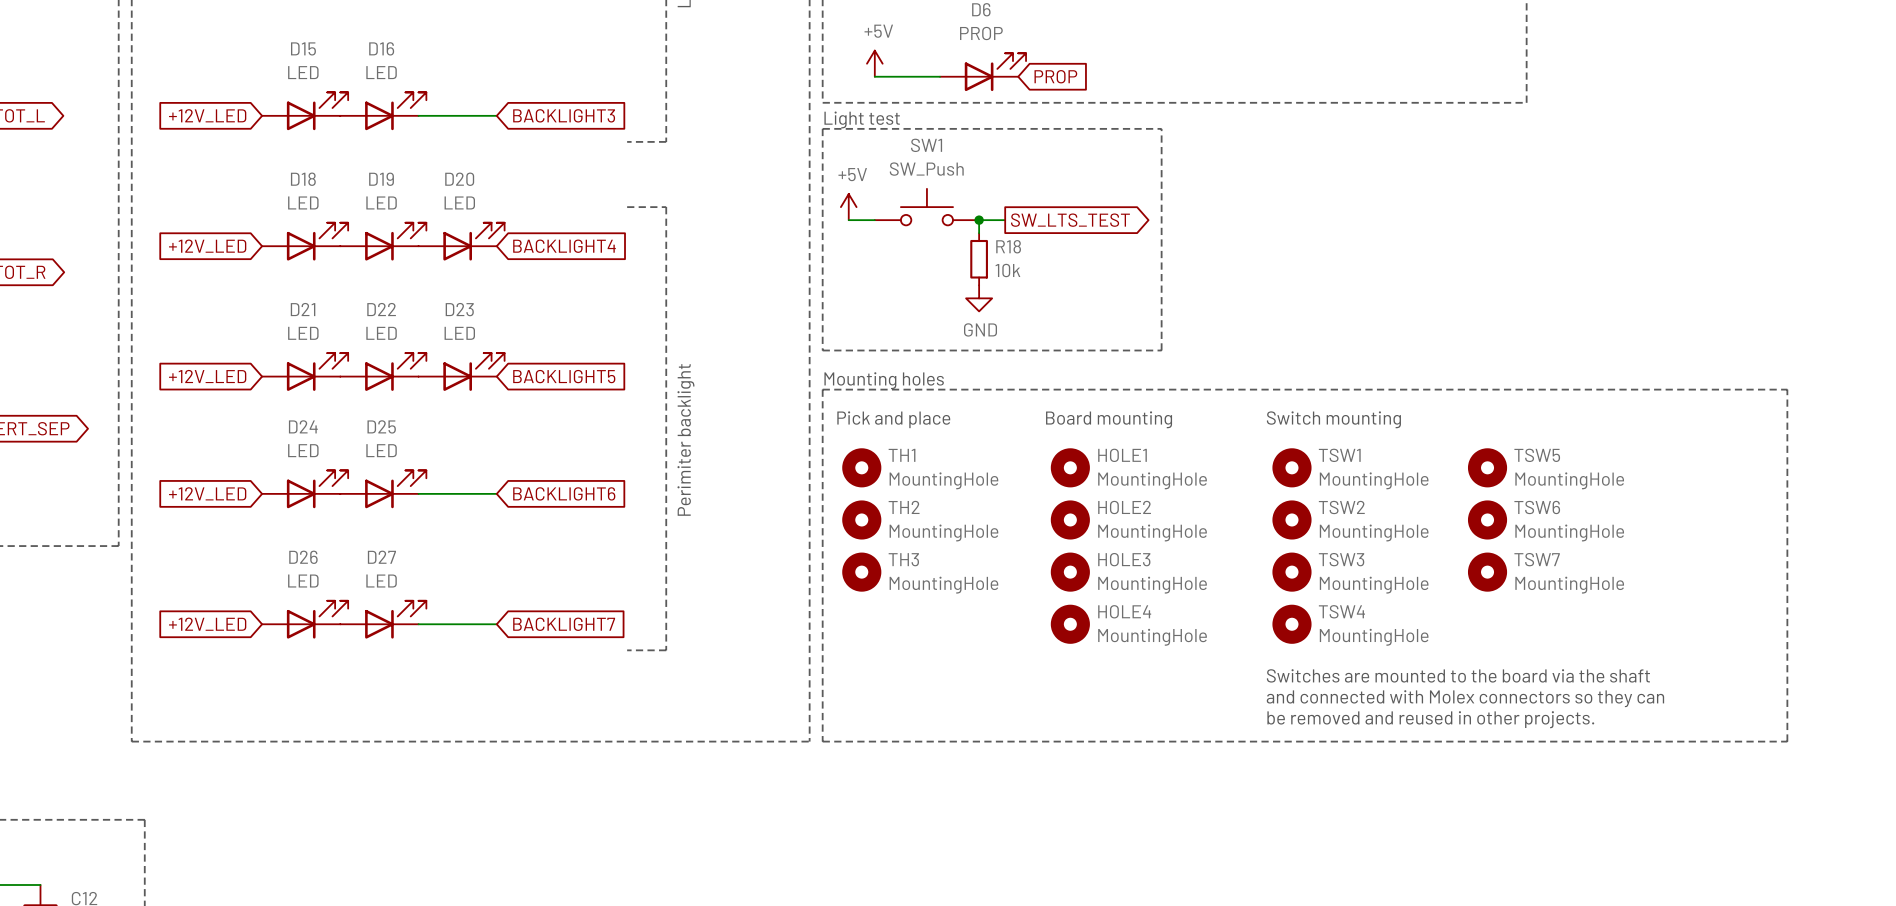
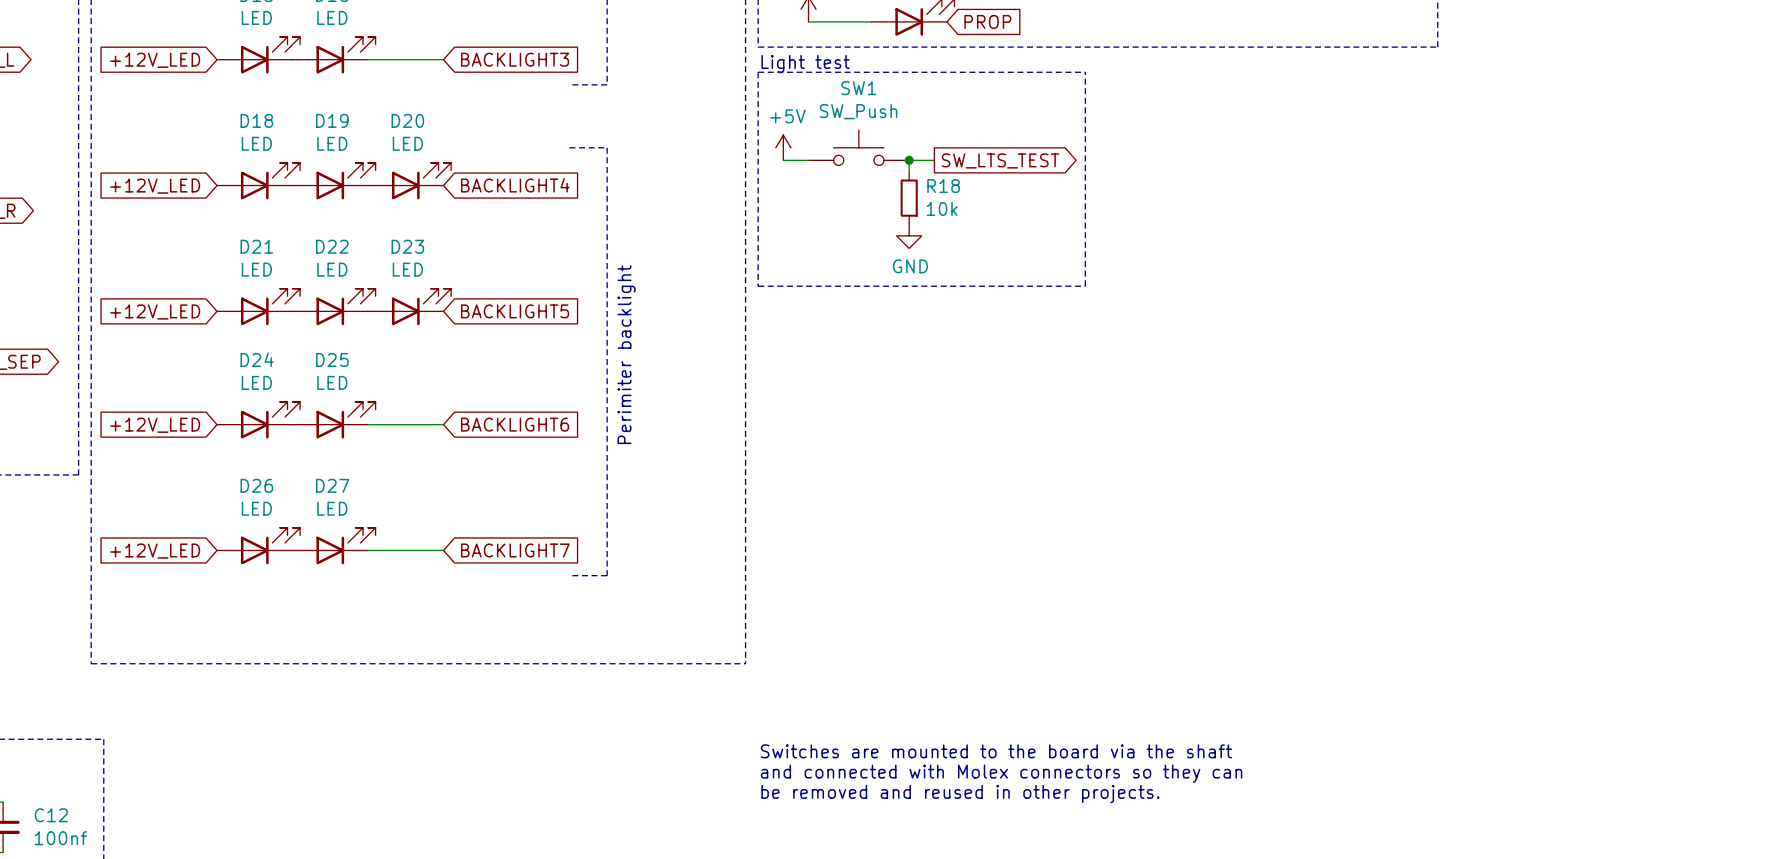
text: Mounting holes (884, 380) -> none
line: (822, 389) (822, 741) (1787, 741) (1787, 389) (822, 389) -> none
text: Pick and place (893, 419) -> none
text: Board mounting (1109, 419) -> none
text: Switch mounting (1333, 419) -> none
TH1: MountingHole (861, 467) -> none
HOLE1: MountingHole (1070, 467) -> none
TSW1: MountingHole (1291, 467) -> none
TSW5: MountingHole (1487, 467) -> none
TH2: MountingHole (861, 519) -> none
HOLE2: MountingHole (1070, 519) -> none
TSW2: MountingHole (1291, 519) -> none
TSW6: MountingHole (1487, 519) -> none
TH3: MountingHole (861, 572) -> none
HOLE3: MountingHole (1070, 572) -> none
TSW3: MountingHole (1291, 572) -> none
TSW7: MountingHole (1487, 572) -> none
HOLE4: MountingHole (1070, 624) -> none
TSW4: MountingHole (1291, 624) -> none
text: Switches are mounted to the board via the shaft (1458, 675) -> none
text: and connected with Molex connectors so they can (1465, 698) -> none
text: be removed and reused in other projects. (1430, 719) -> none
text: none -> Switches are mounted to the board via the shaft (996, 751)
text: none -> and connected with Molex connectors so they can (1001, 773)
text: none -> be removed and reused in other projects. (960, 793)

